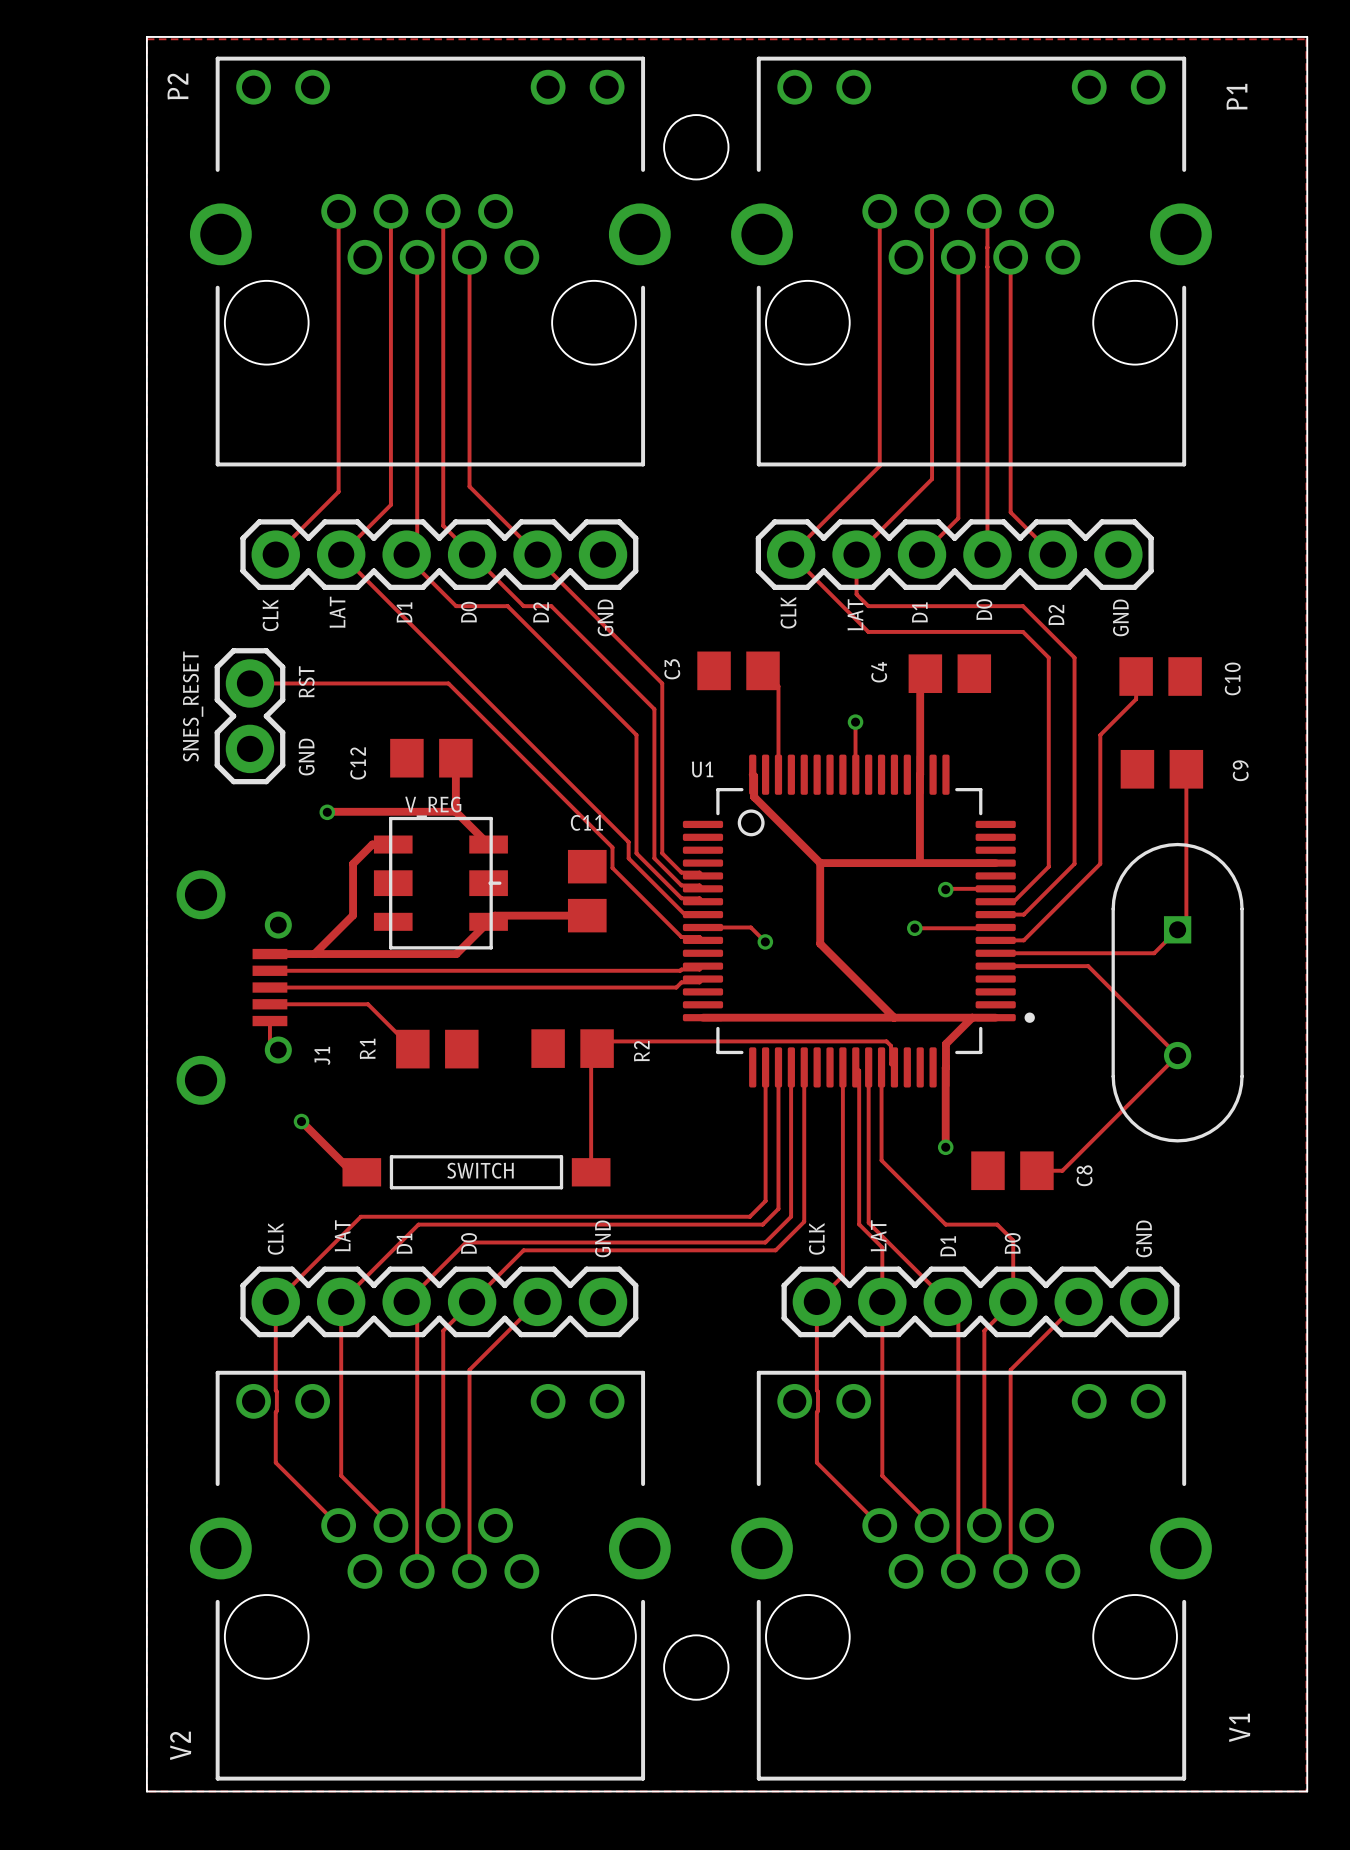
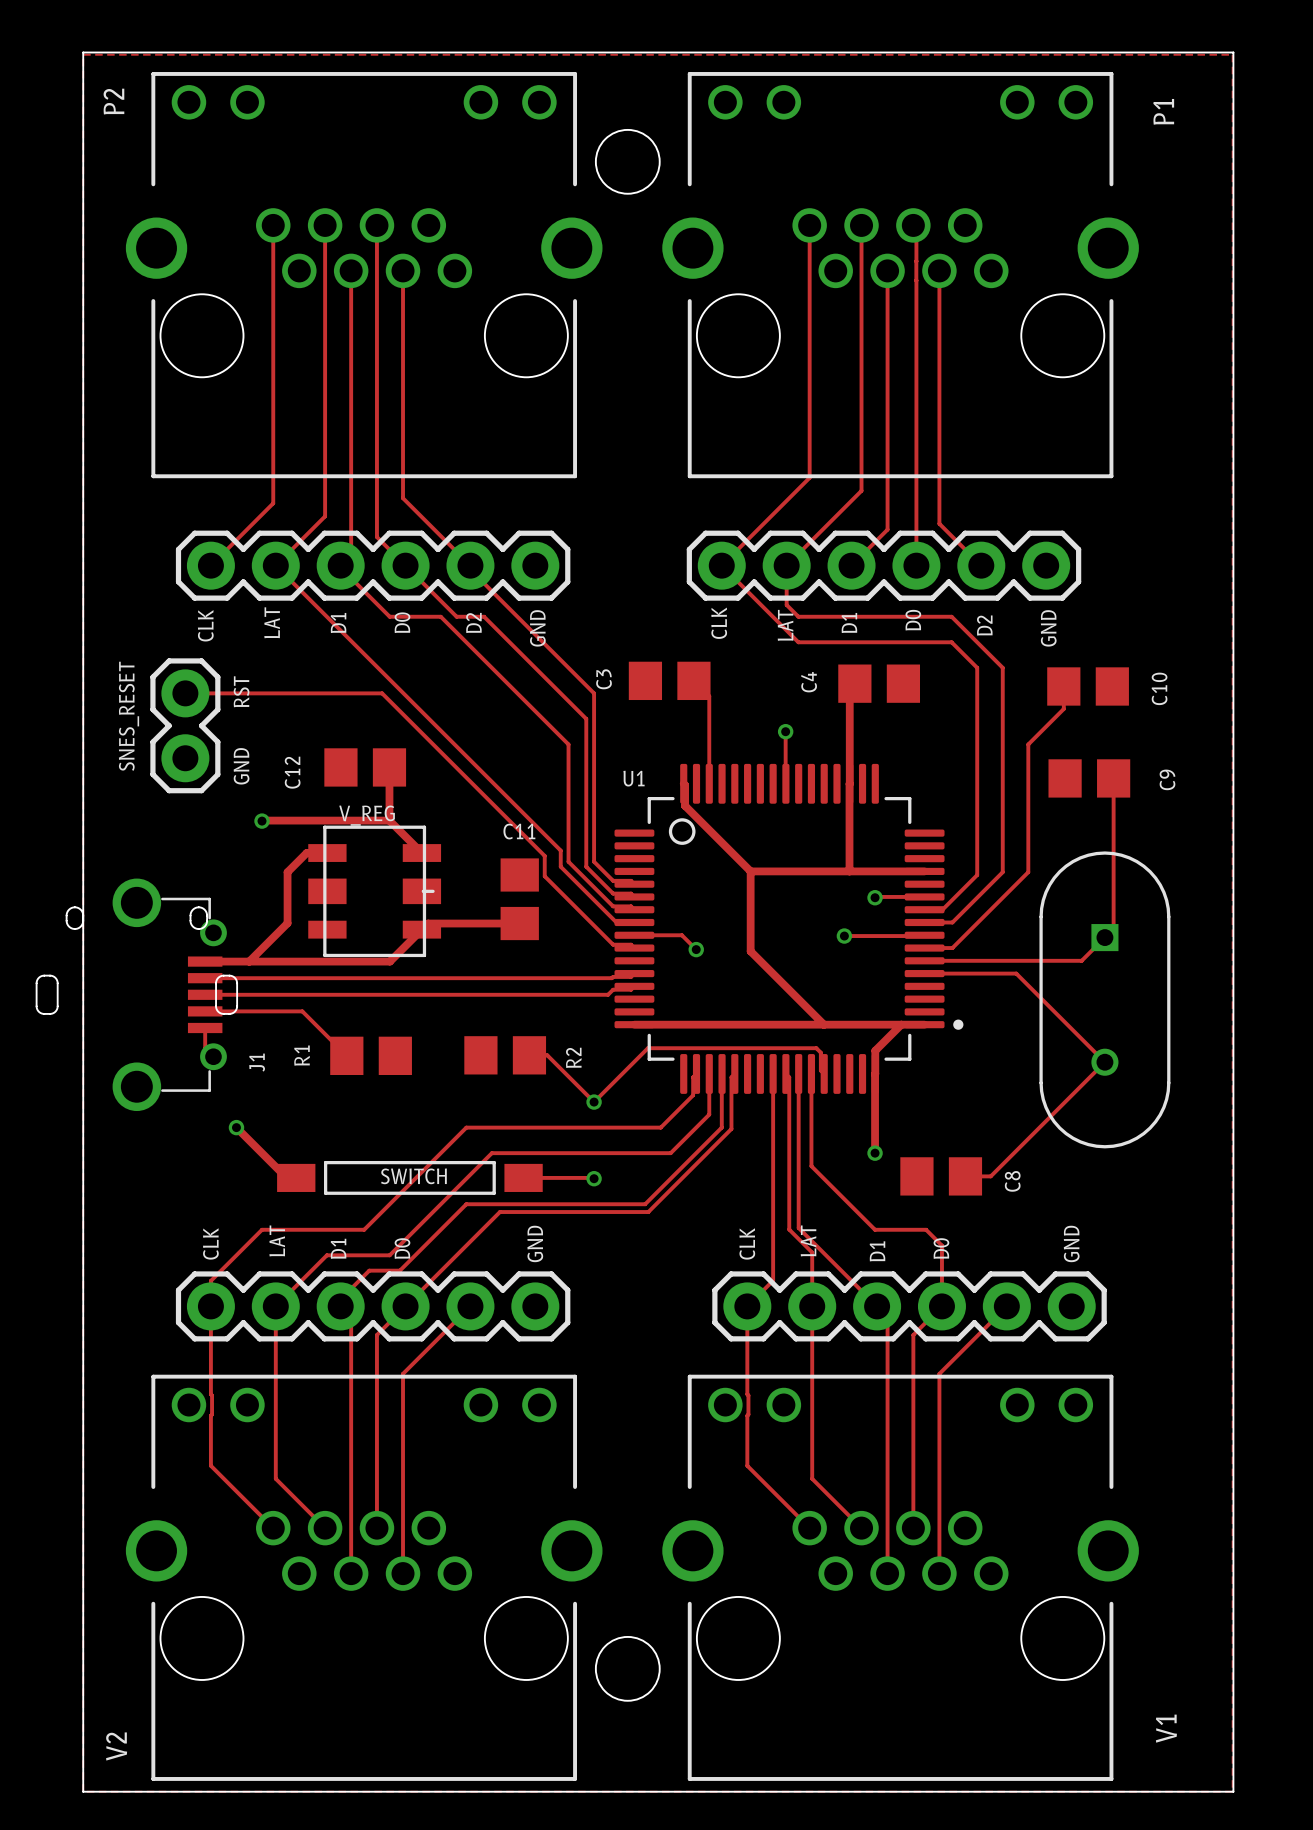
J1 footprint: [176, 870, 292, 1105] -> [36, 878, 238, 1112]
track: (716, 1041) (604, 1041) (591, 1054) (591, 1172) -> (647, 1048) (594, 1102) (547, 1055) (529, 1055)
track: (765, 1067) (765, 1201) (749, 1216) (360, 1216) (275, 1301) -> none
track: (804, 1067) (804, 1221) (775, 1250) (523, 1250) -> (734, 1073) (731, 1077) (731, 1128) (648, 1212) (499, 1212) (456, 1255)
via: none -> (594, 1102)
track: (778, 1108) (778, 1208) (762, 1224) (430, 1224) -> (696, 1073) (693, 1077) (693, 1095) (660, 1127) (466, 1127) (364, 1229)
track: none -> (709, 1114) (670, 1153) (491, 1153) (389, 1255) (326, 1255)
track: (791, 1121) (791, 1216) (765, 1242) (466, 1242) (406, 1301) -> (721, 1127) (645, 1204) (466, 1204) (399, 1270) (369, 1270) (340, 1299) (340, 1306)
track: none -> (523, 1177) (594, 1178)
via: none -> (594, 1178)
track: (418, 1224) (392, 1250) -> (352, 1229) (262, 1229) (210, 1280) (210, 1306)

